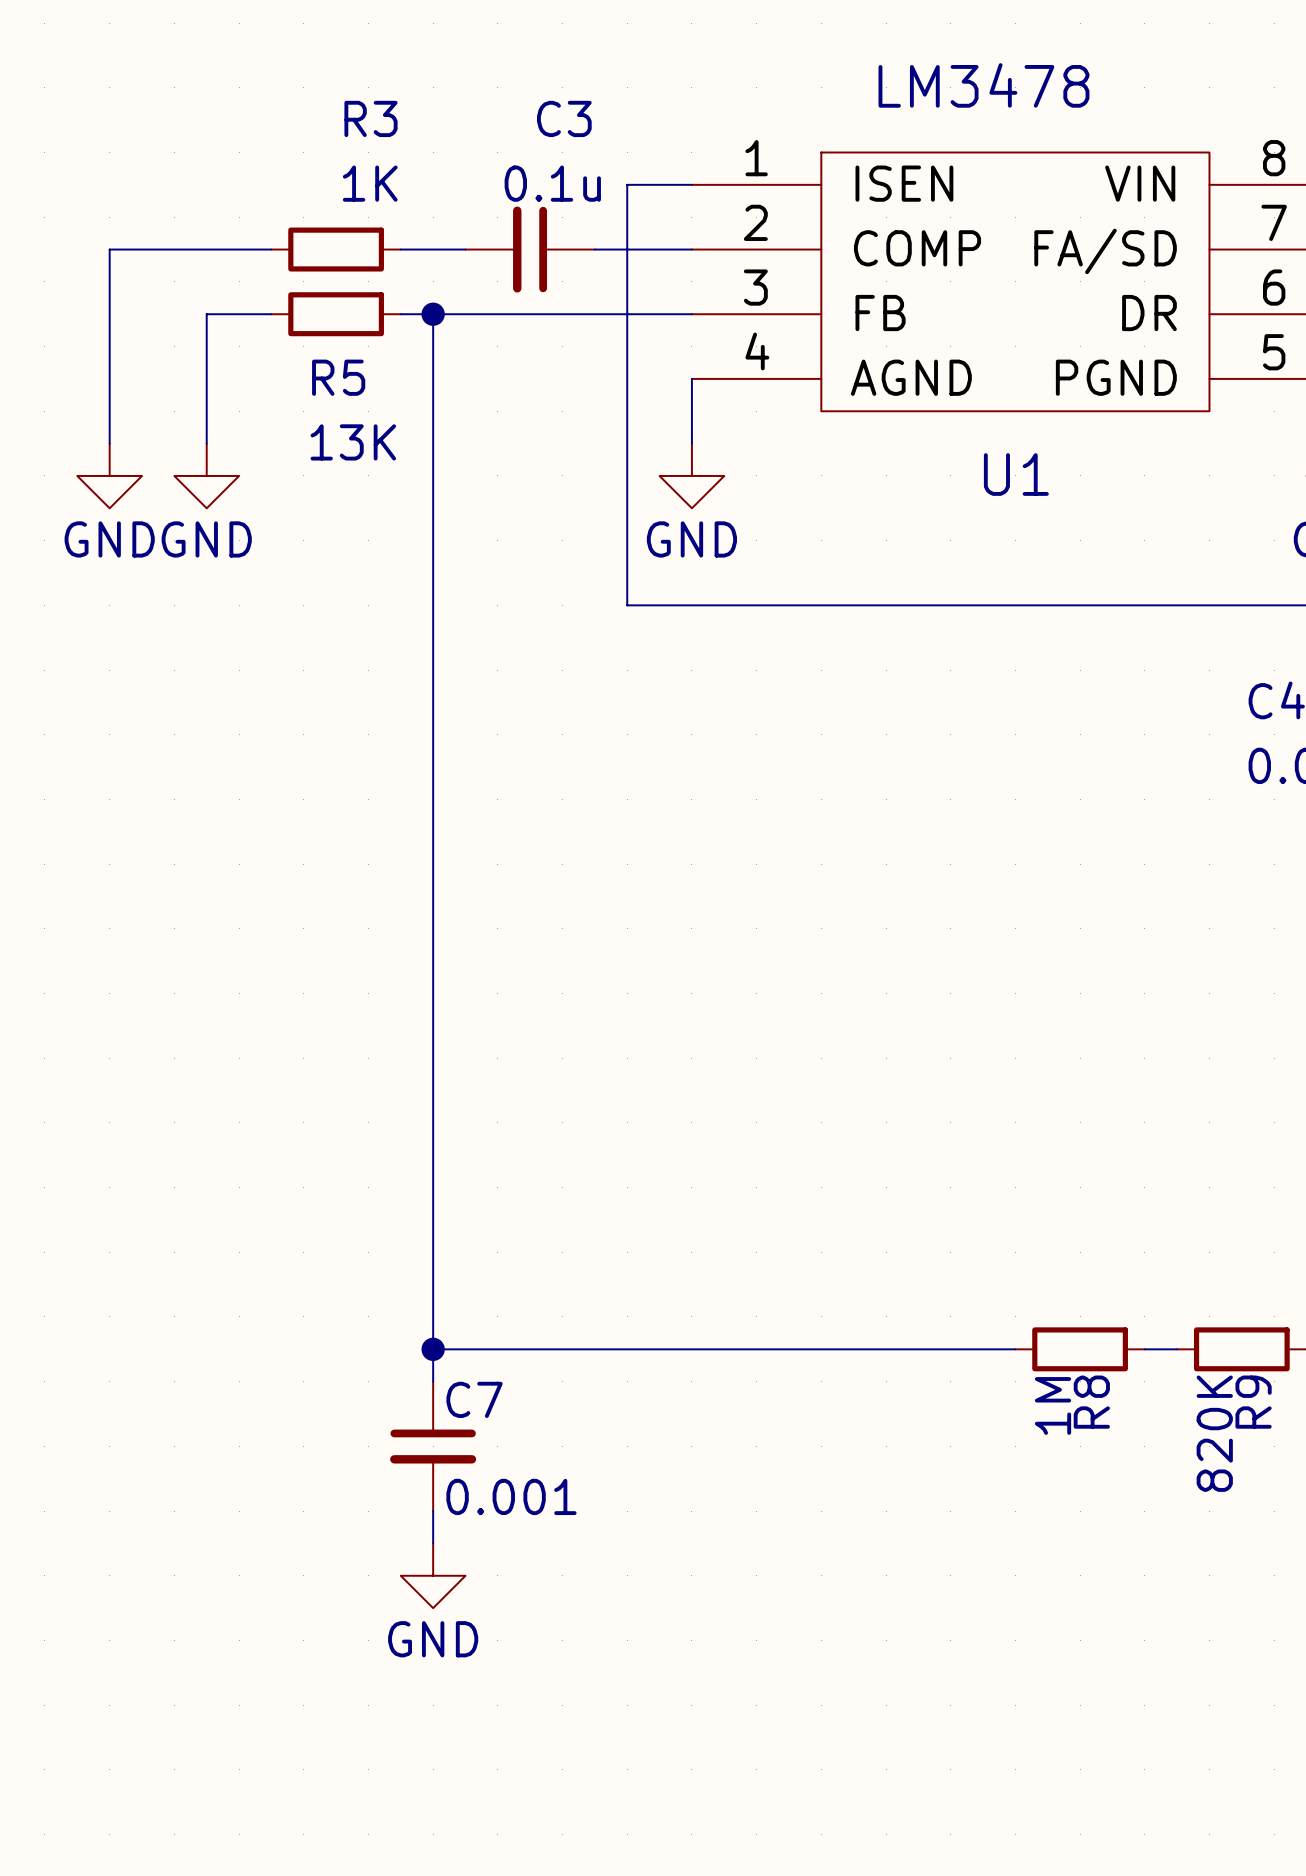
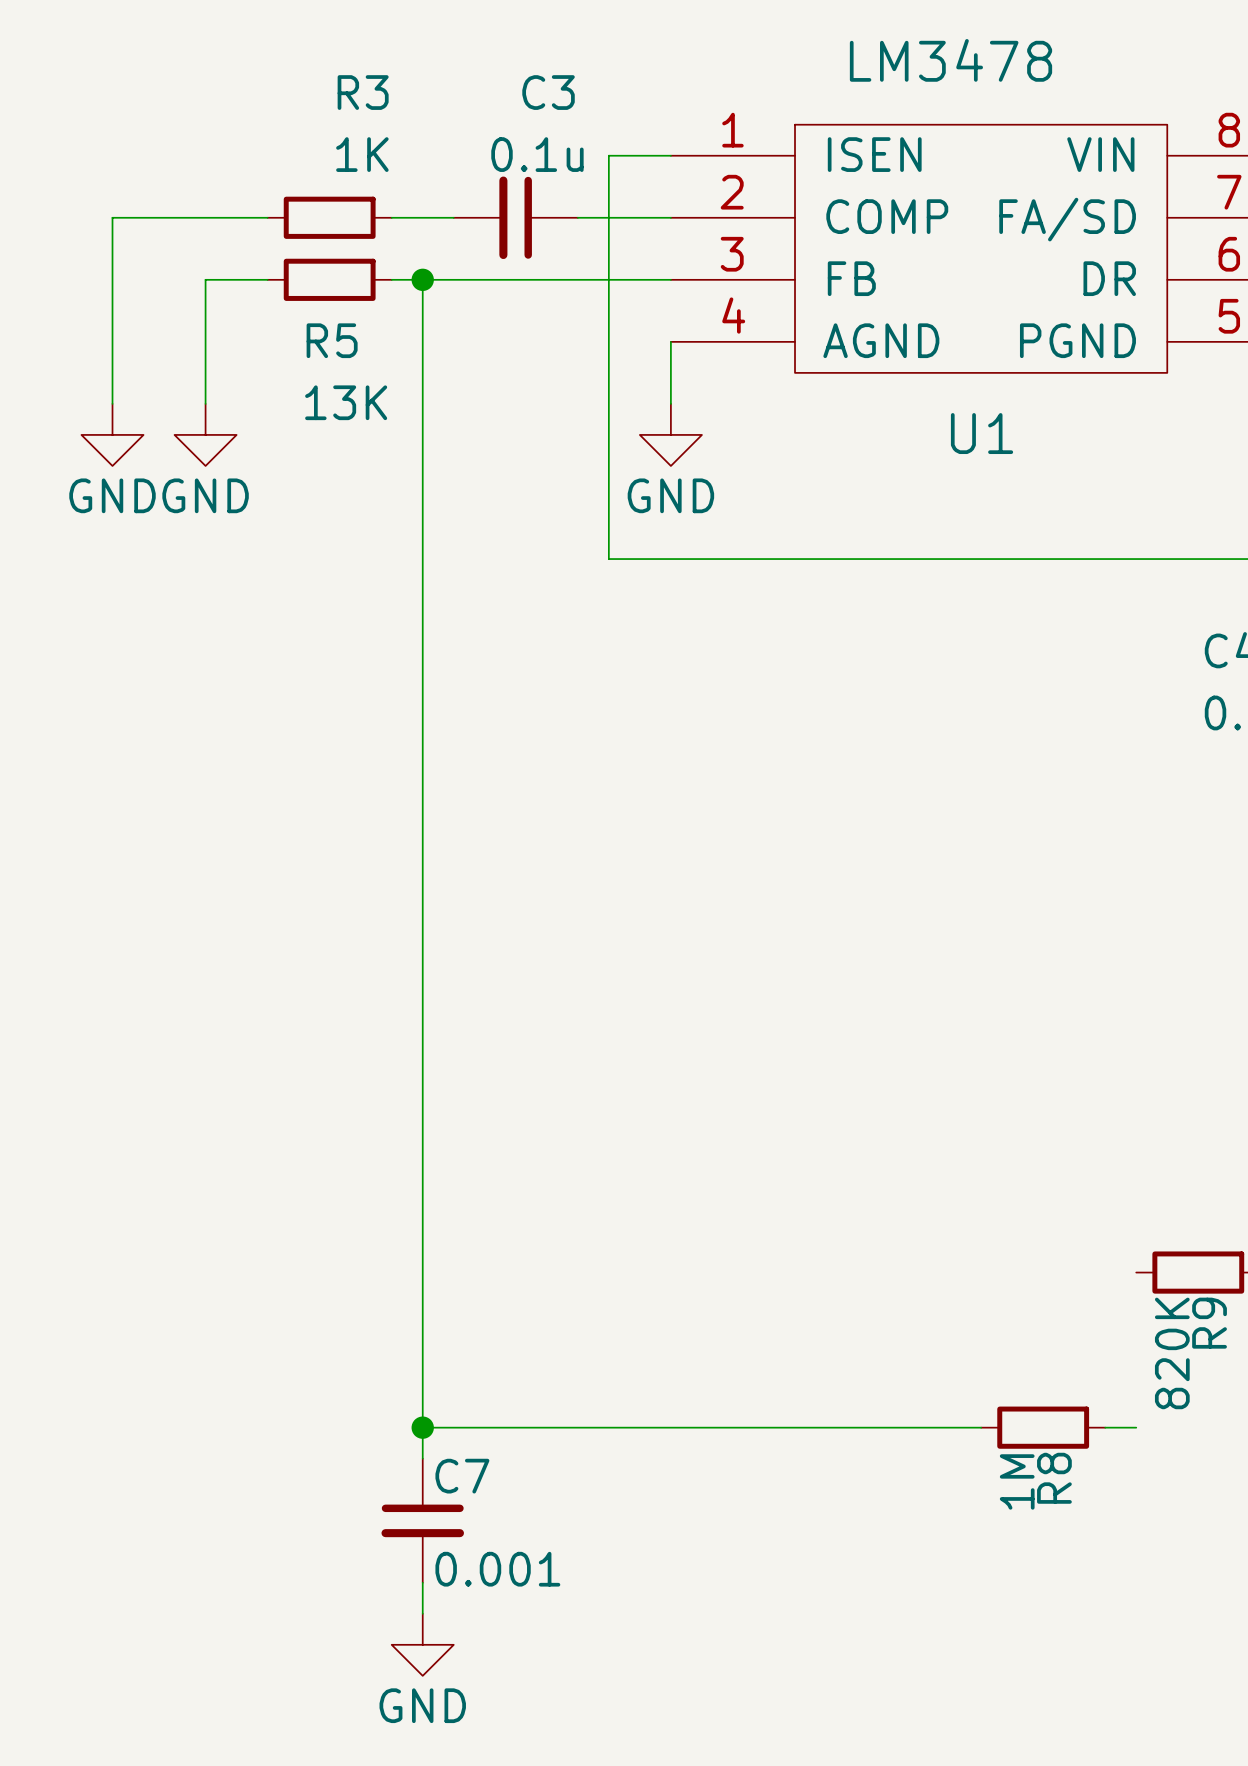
wire: (433, 1349) (1015, 1349) -> none
junction: (433, 1349) -> none
R8 position: (1080, 1349) -> (1043, 1427)
wire: (1144, 1349) (1177, 1349) -> (1105, 1427) (1136, 1427)
wire: none -> (422, 1303) (422, 1427) (981, 1427)
C7 position: (433, 1446) -> (422, 1520)
junction: none -> (422, 1427)
power symbol position: GND (433, 1575) -> GND (422, 1644)
wire: none -> (422, 1582) (422, 1613)

